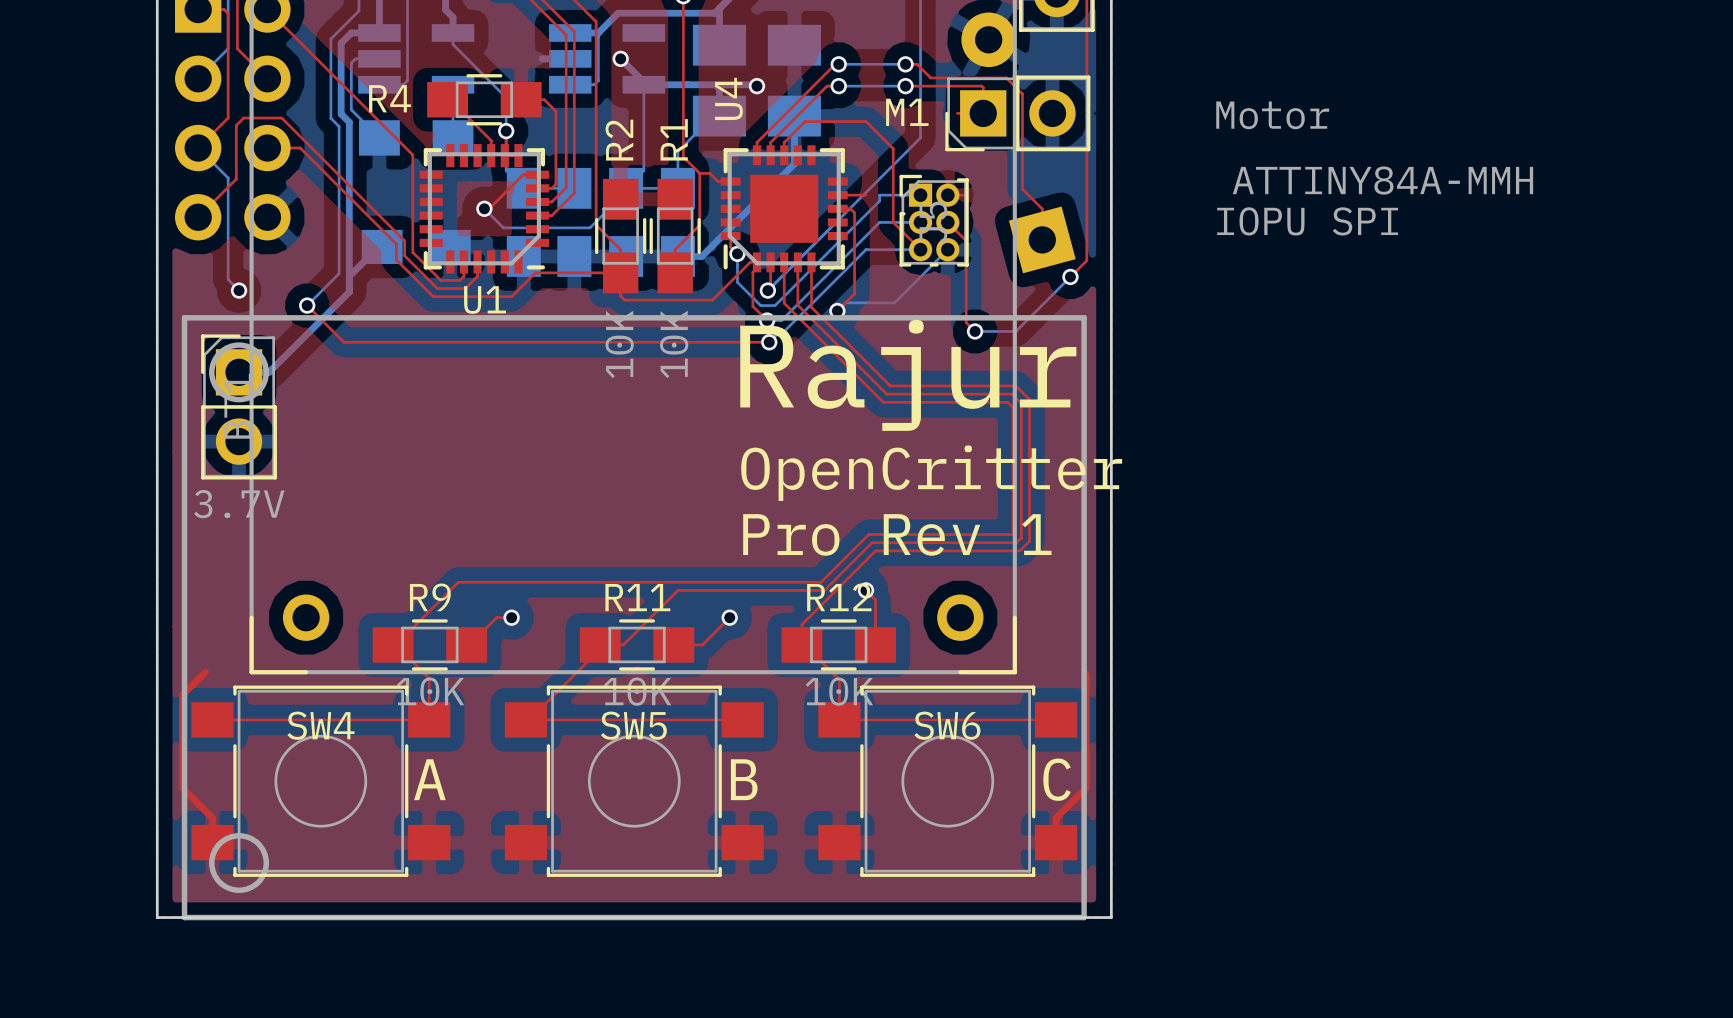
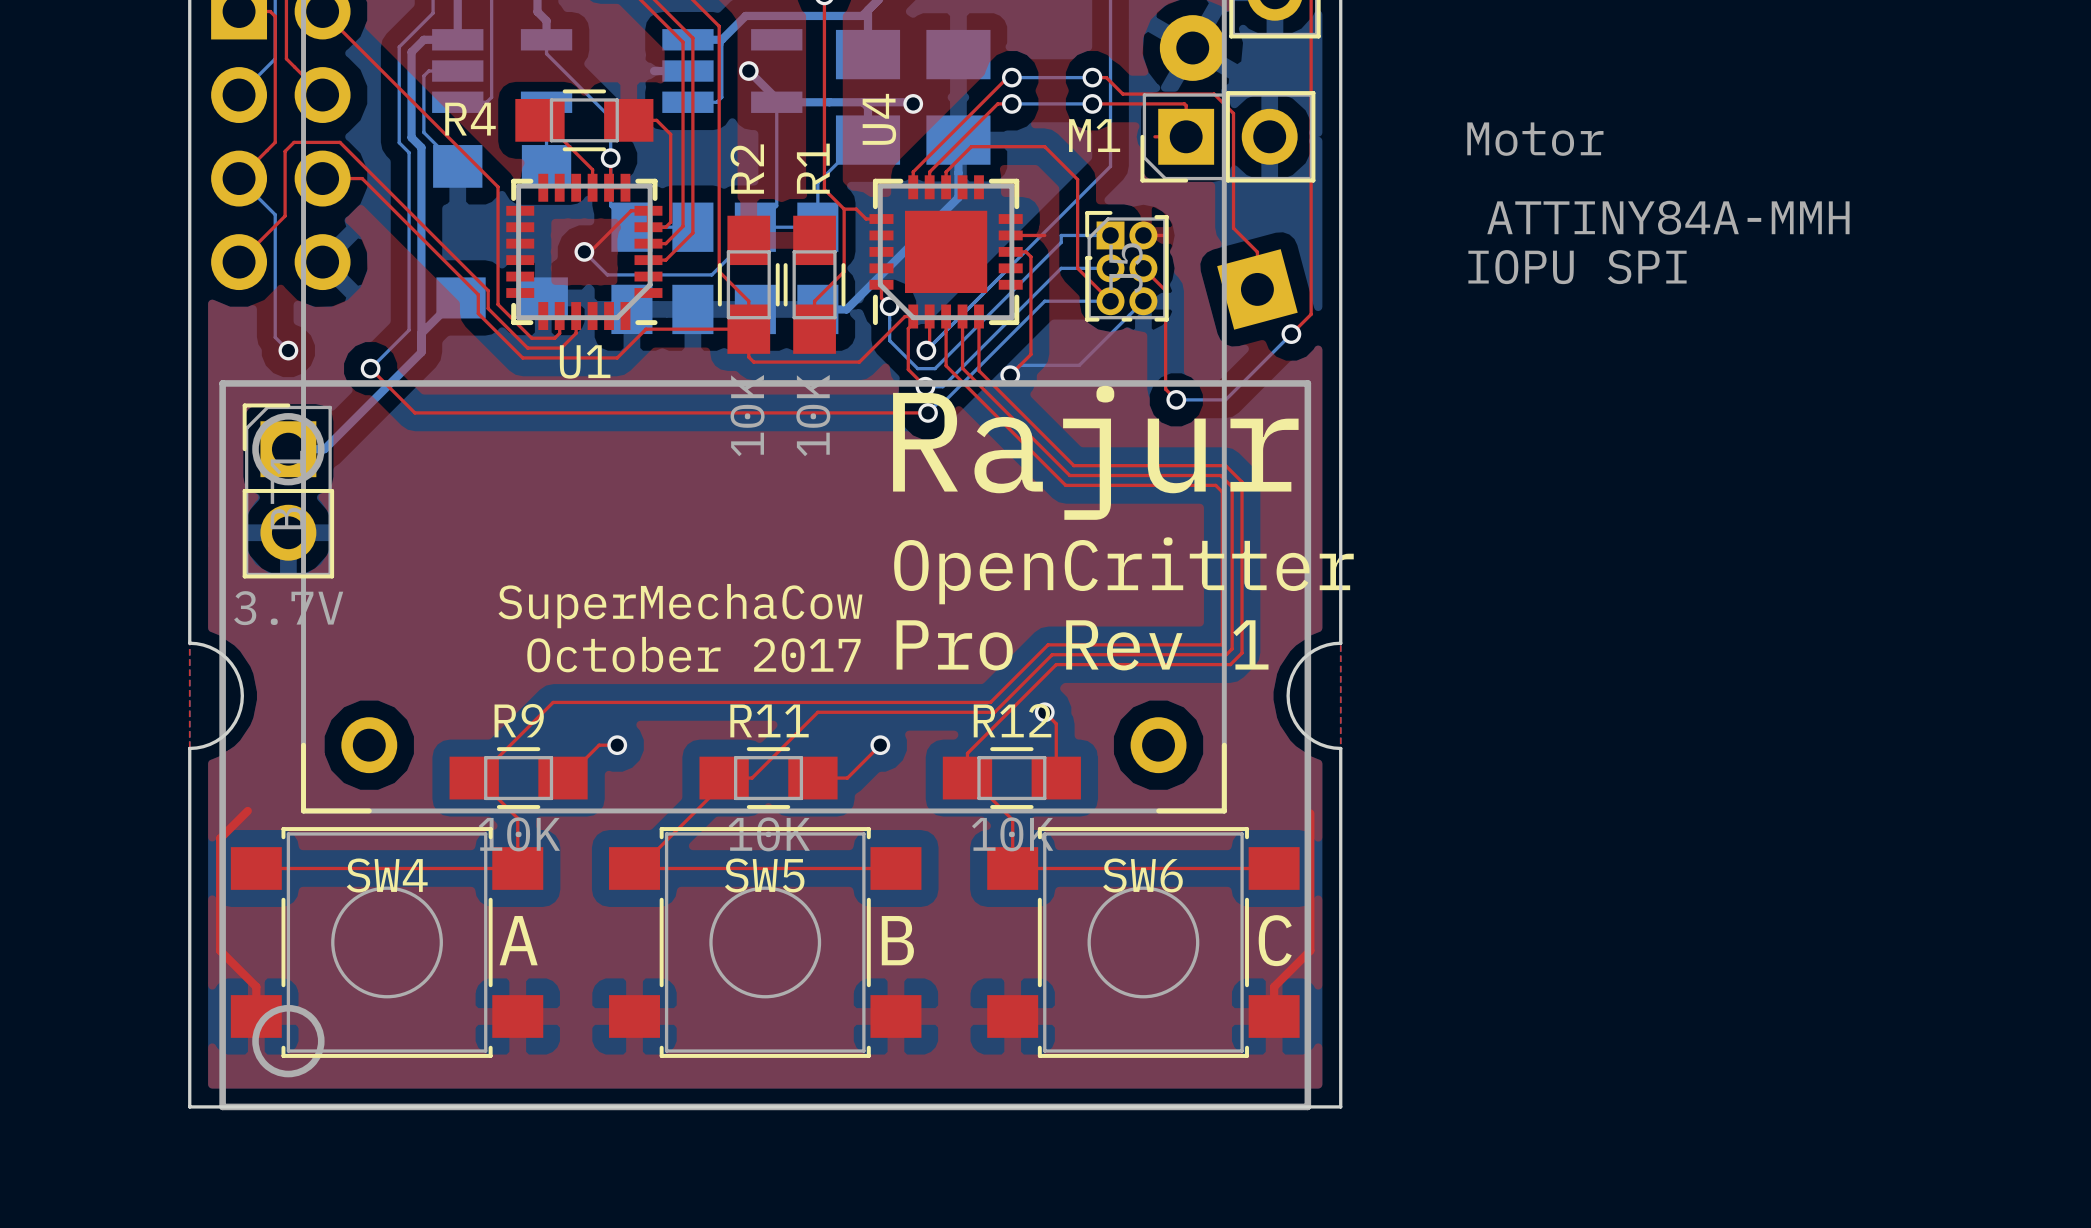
text: none -> SuperMechaCow (680, 606)
board edge: (157, 533) (157, 620) -> (189, 643) (209, 647) (226, 658) (238, 675) (242, 695) (238, 715) (226, 733) (209, 744) (189, 748)
board edge: (1111, 533) (1111, 620) -> (1340, 643) (1320, 647) (1303, 658) (1292, 675) (1288, 695) (1292, 715) (1303, 733) (1320, 744) (1340, 748)
text: none -> October 2017 (693, 654)

